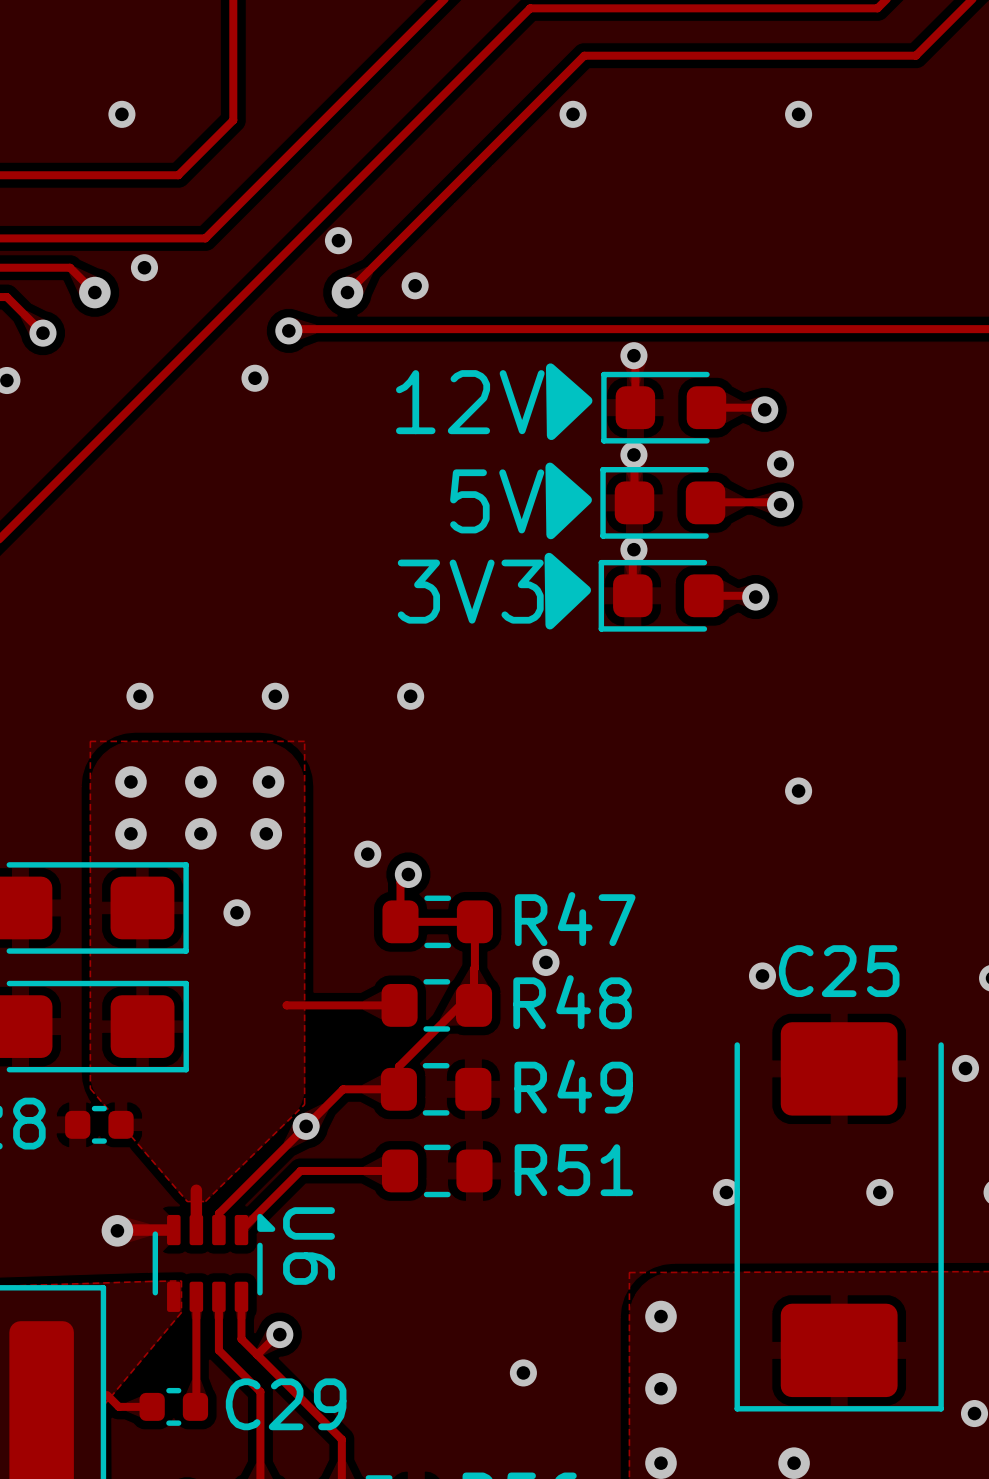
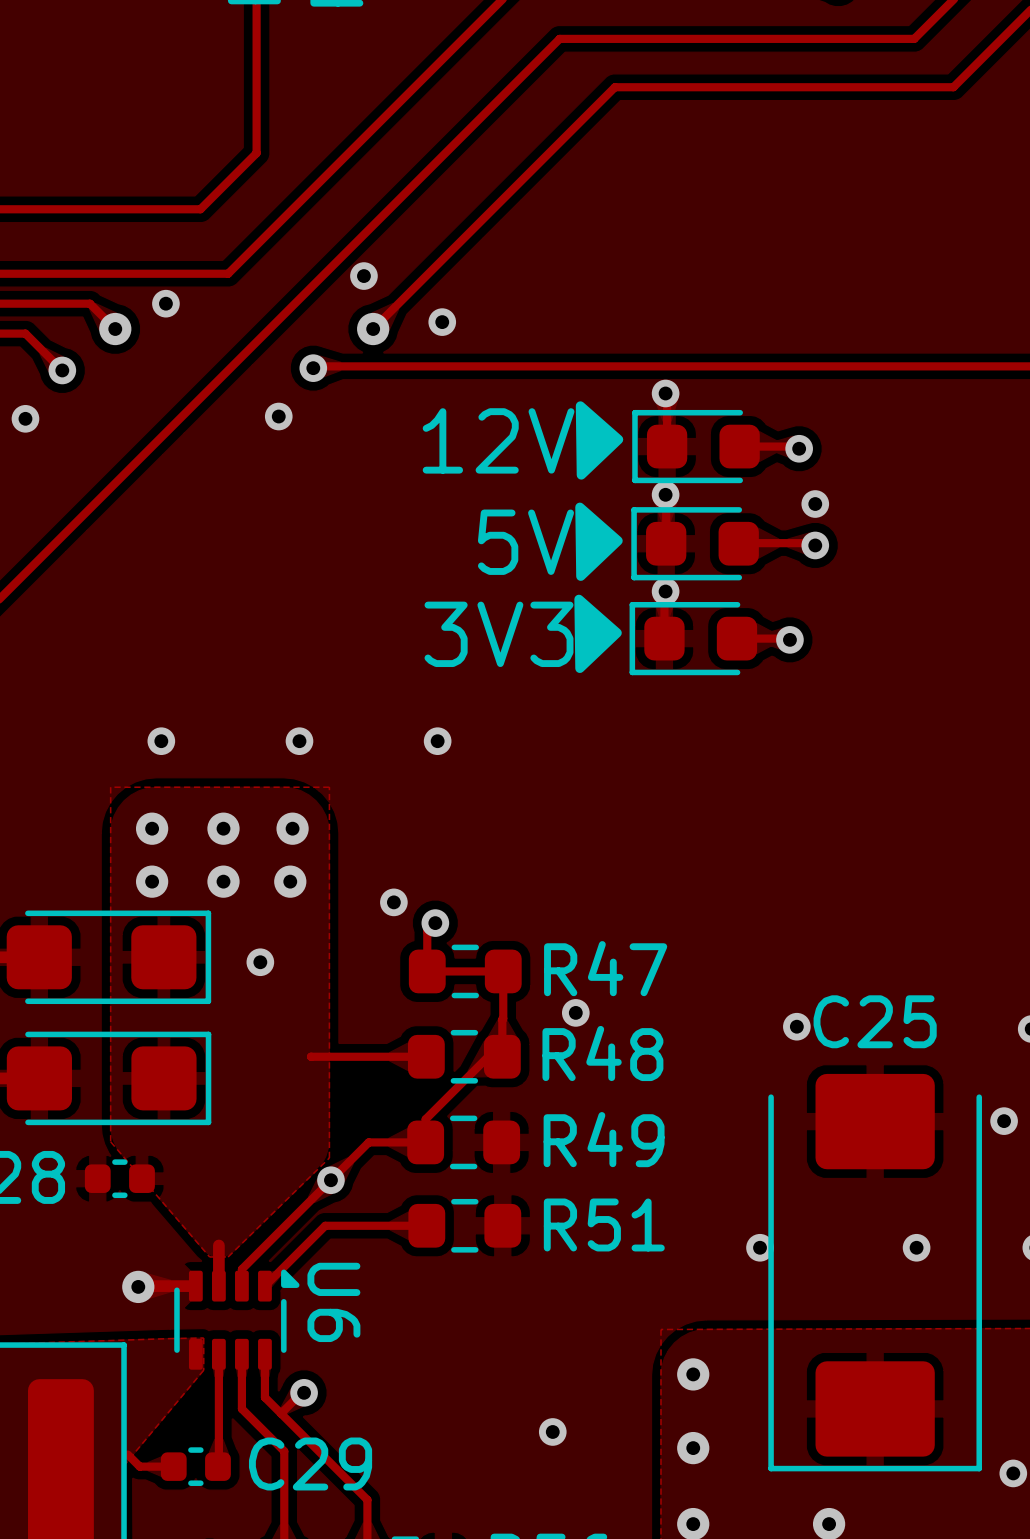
via: (121, 114) -> none
via: (573, 114) -> none
via: (798, 114) -> none
via: (798, 791) -> none

